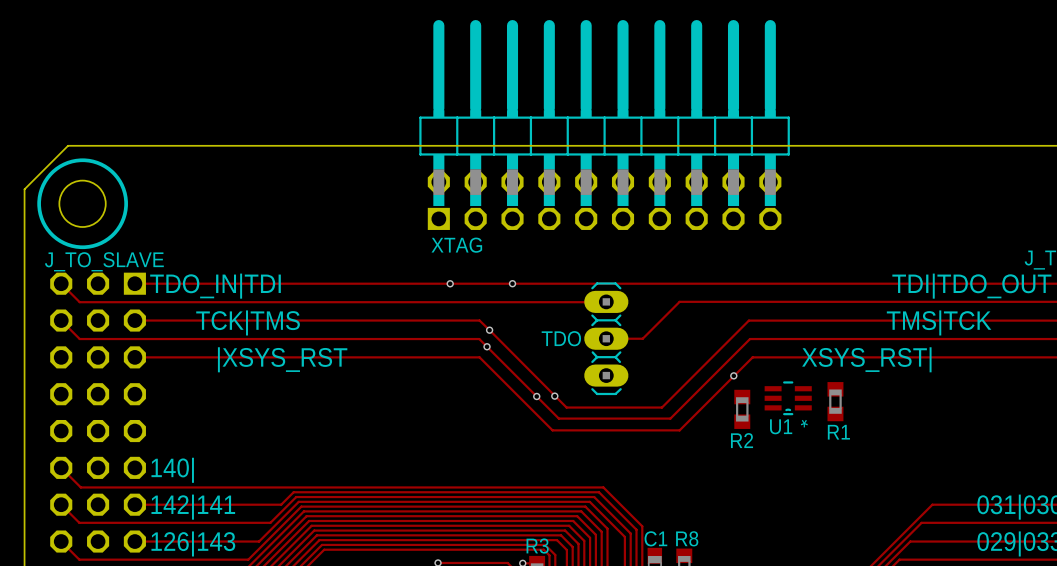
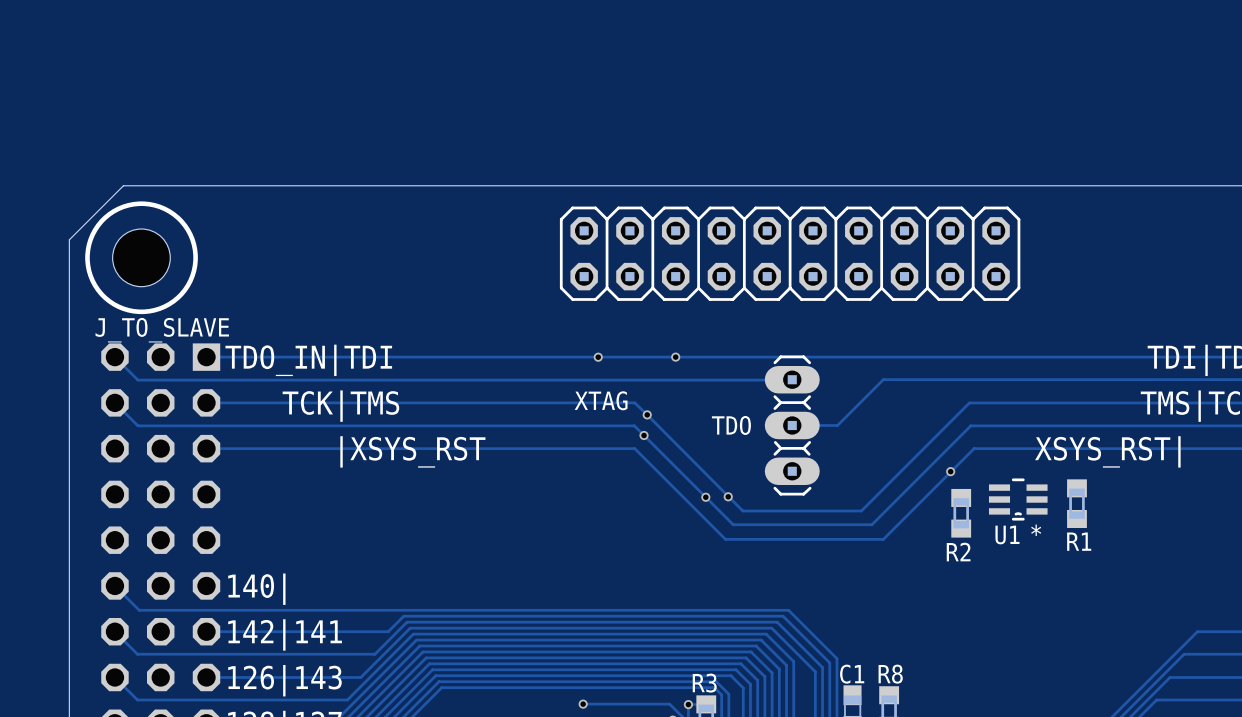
XTAG: (604, 124) -> none
XTAG: none -> (790, 253)

